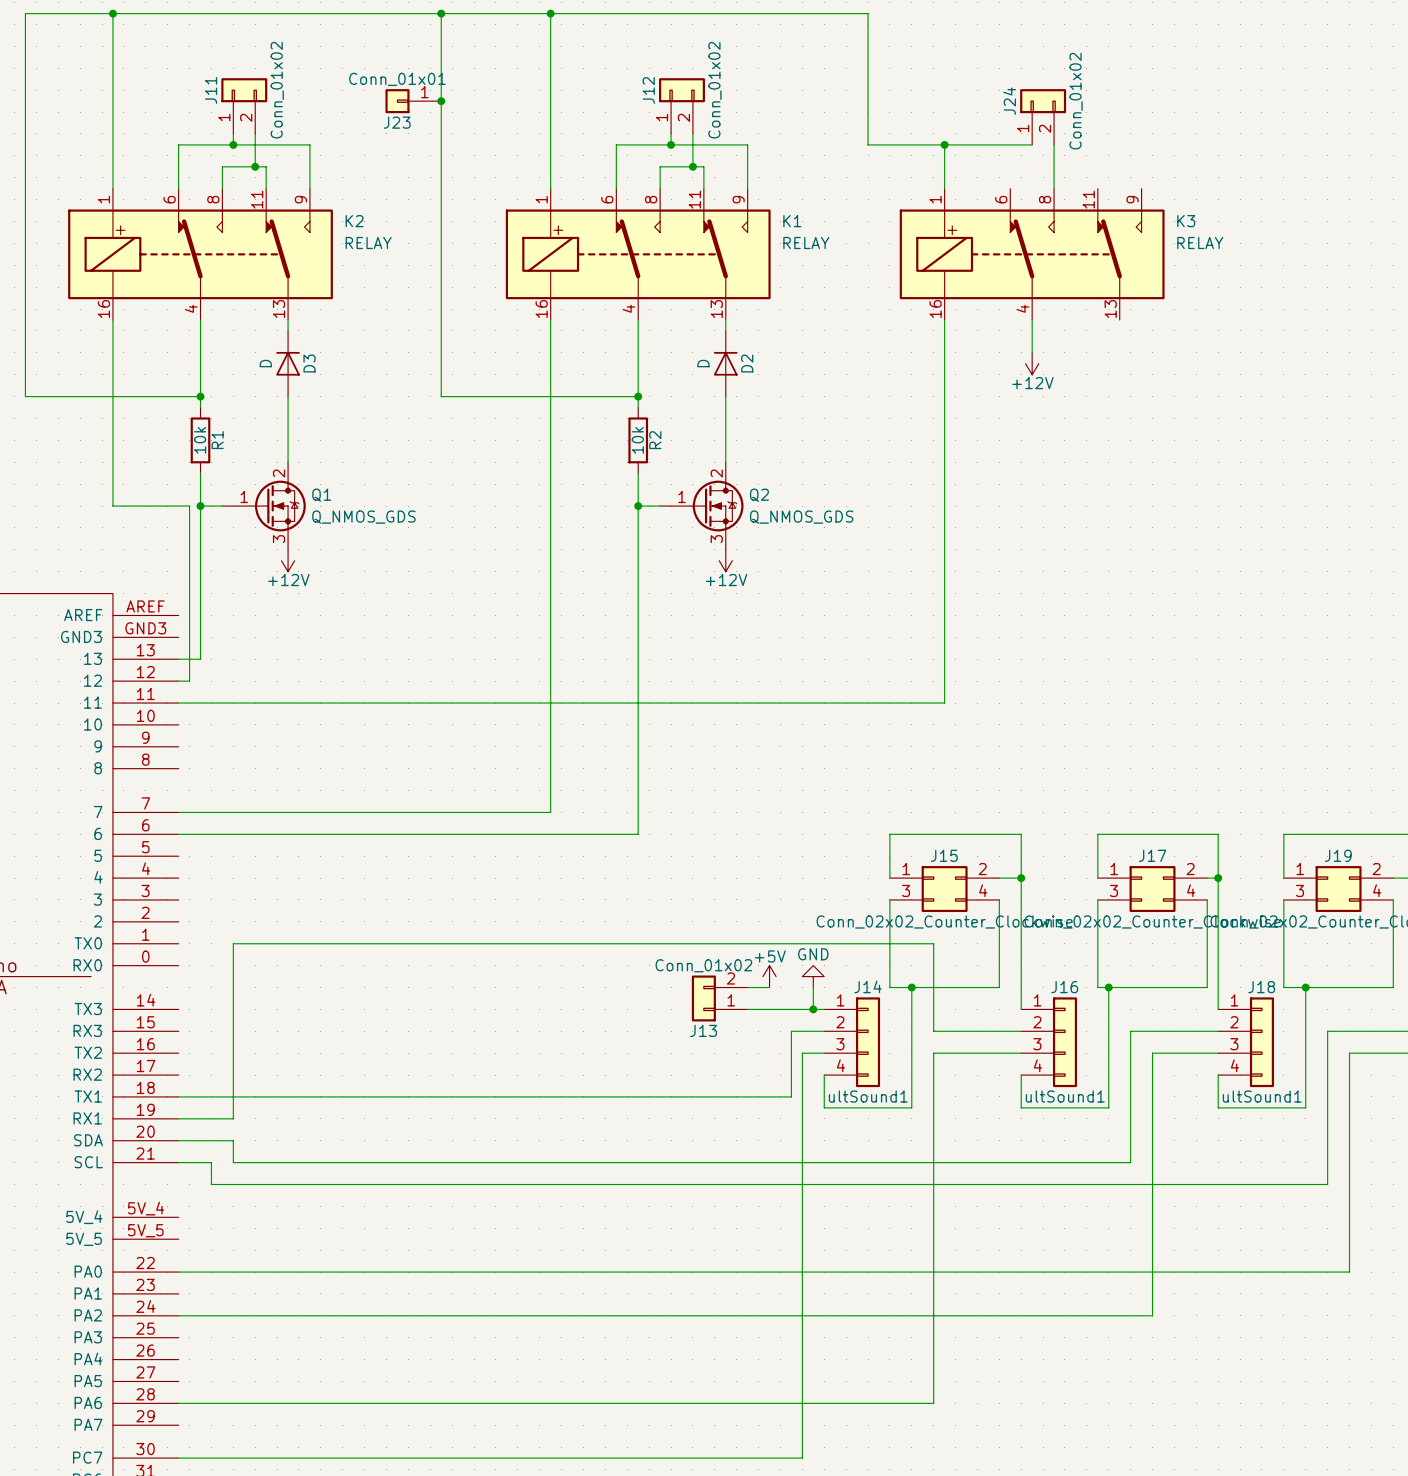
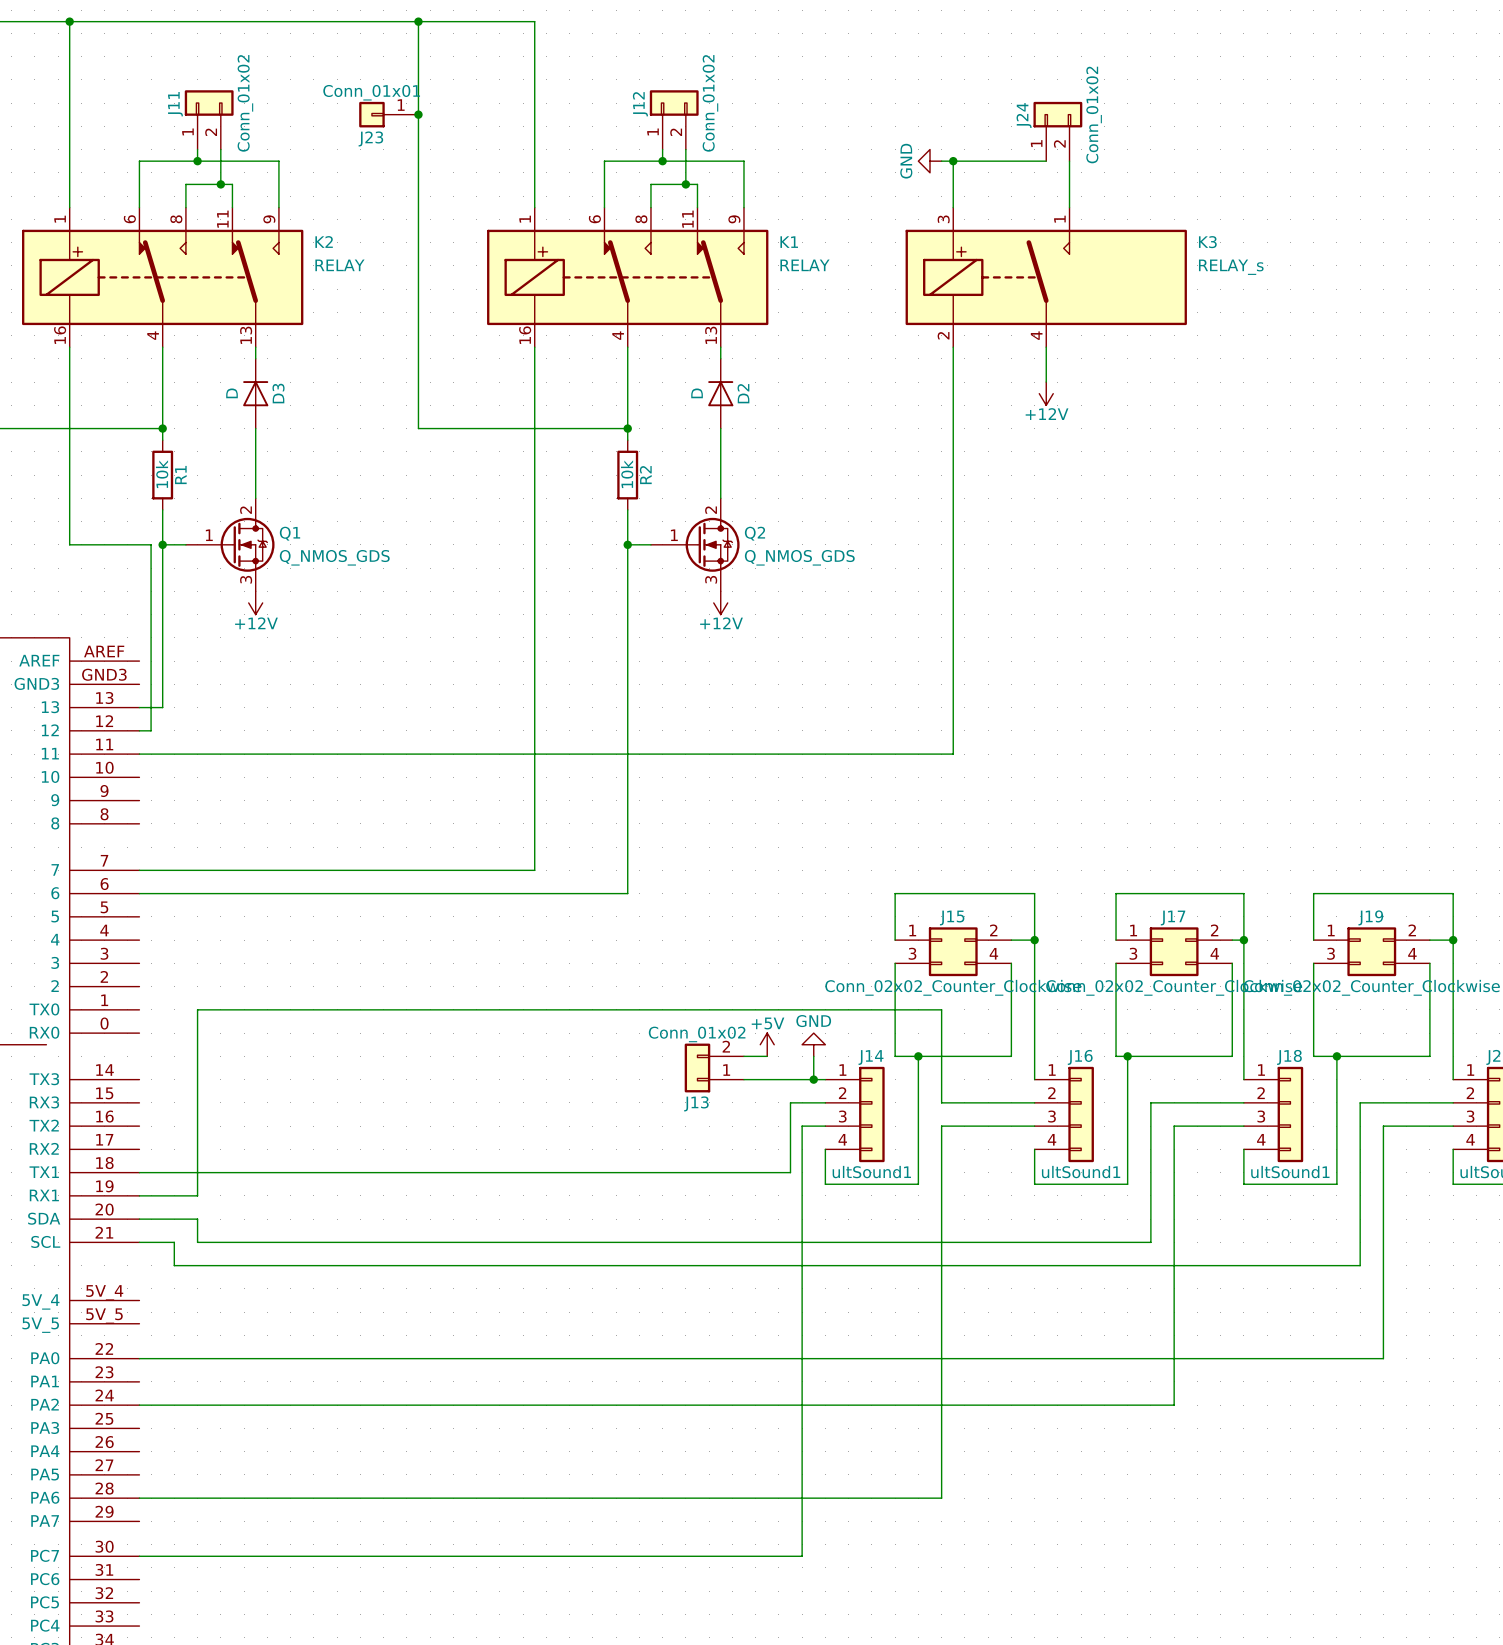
wire: (550, 13) (868, 13) (868, 144) (933, 144) -> none
junction: (550, 13) -> none
power symbol: none -> GND (930, 161)
K3 symbol: [899, 188, 1165, 321] -> [905, 207, 1187, 348]
K3 value: RELAY (1200, 243) -> RELAY_s (1231, 267)

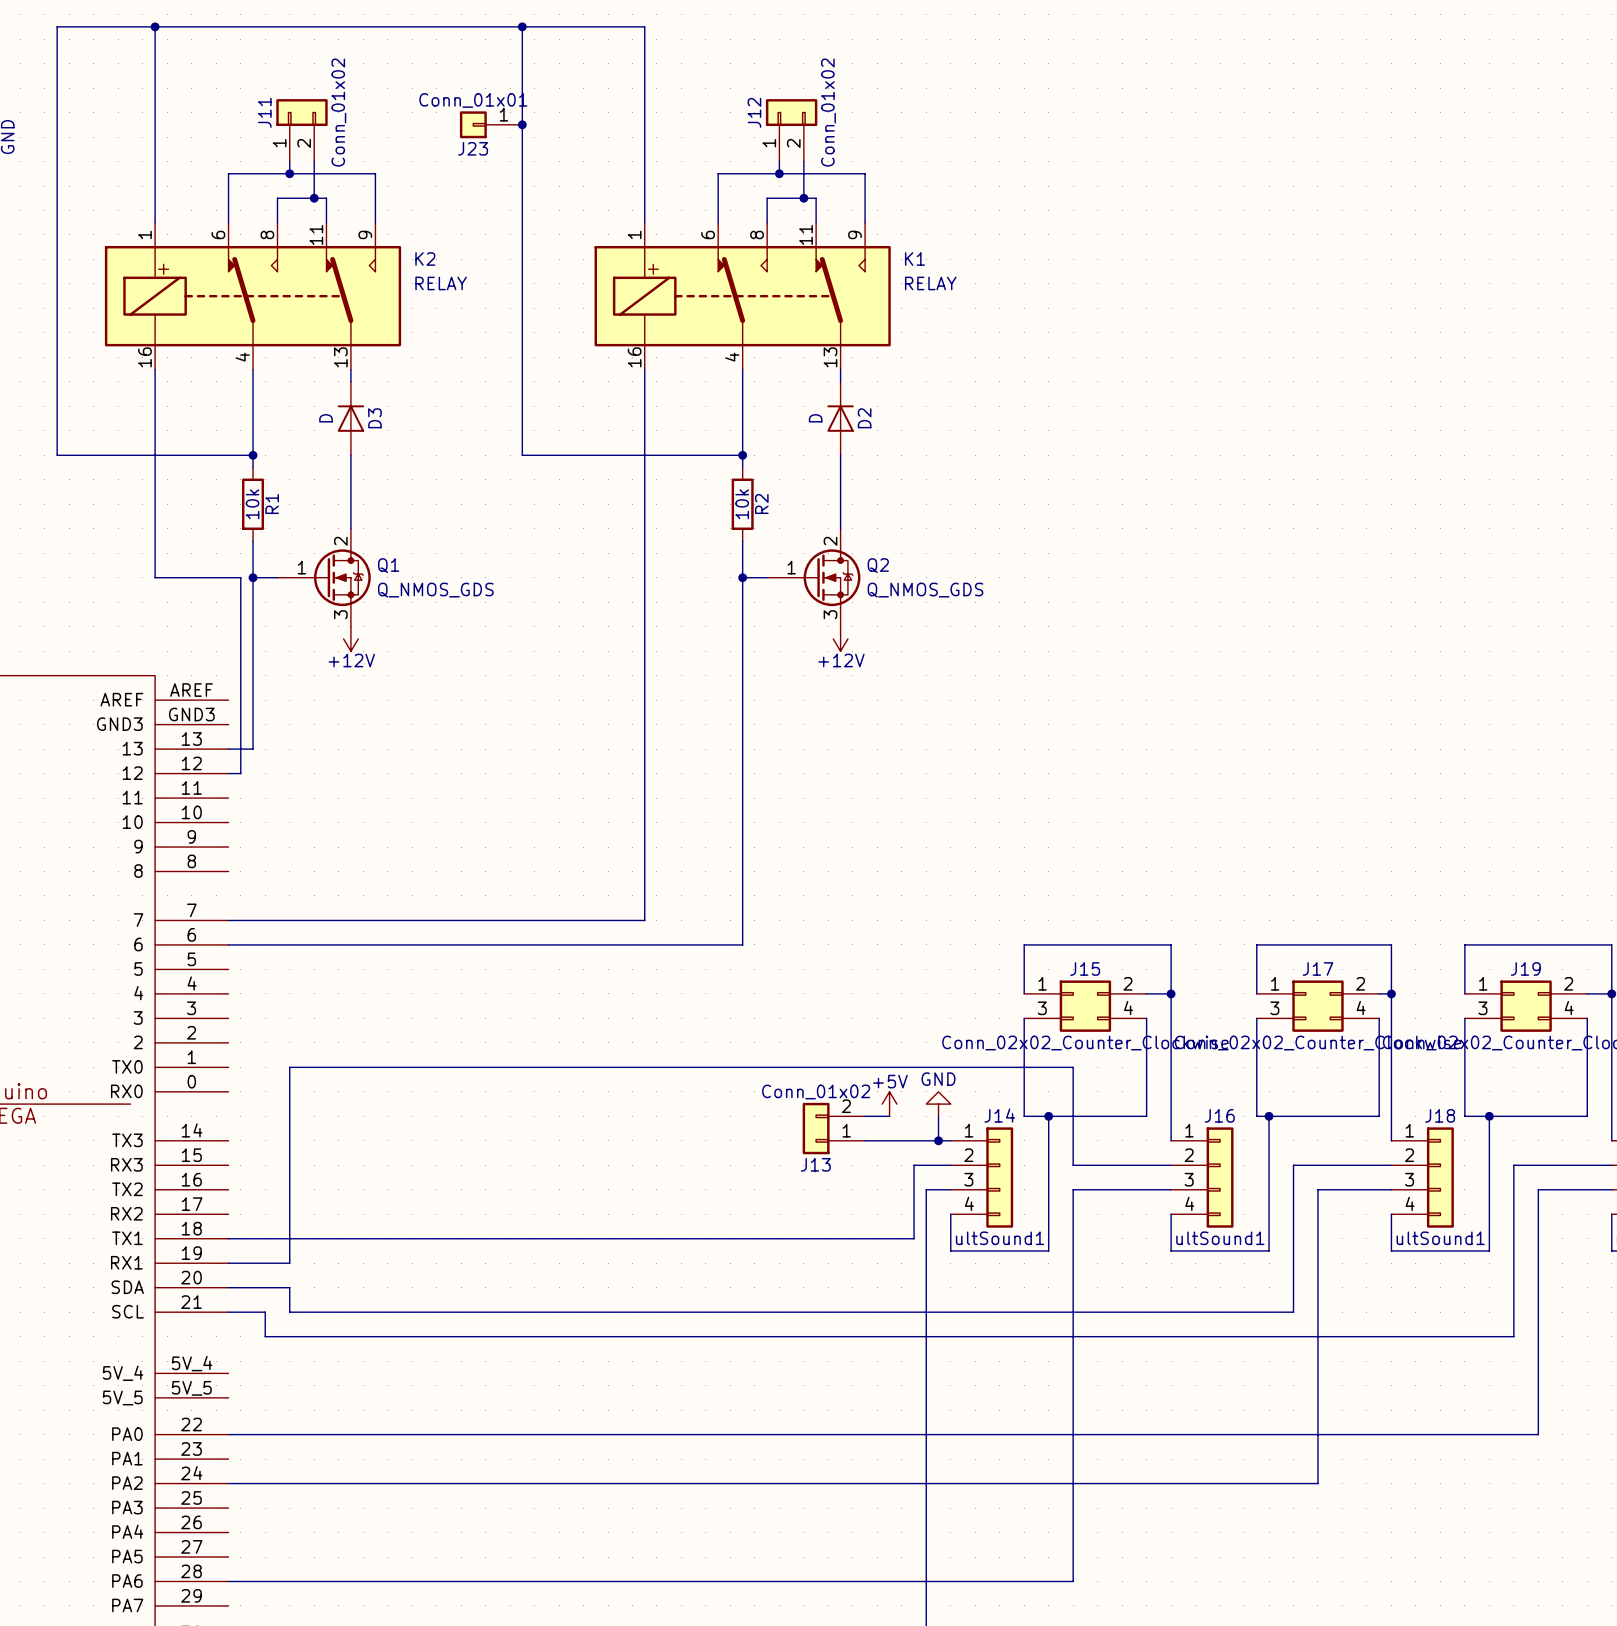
J24: Conn_01x02 (1057, 131) -> none
power symbol: GND (930, 161) -> none
wire: (941, 161) (1046, 161) -> none
wire: (953, 161) (953, 207) -> none
junction: (953, 161) -> none
wire: (1069, 161) (1069, 207) -> none
K3: RELAY_s (1046, 277) -> none
wire: (953, 347) (953, 754) (139, 754) -> none
wire: (1046, 347) (1046, 382) -> none
power symbol: +12V (1046, 393) -> none

